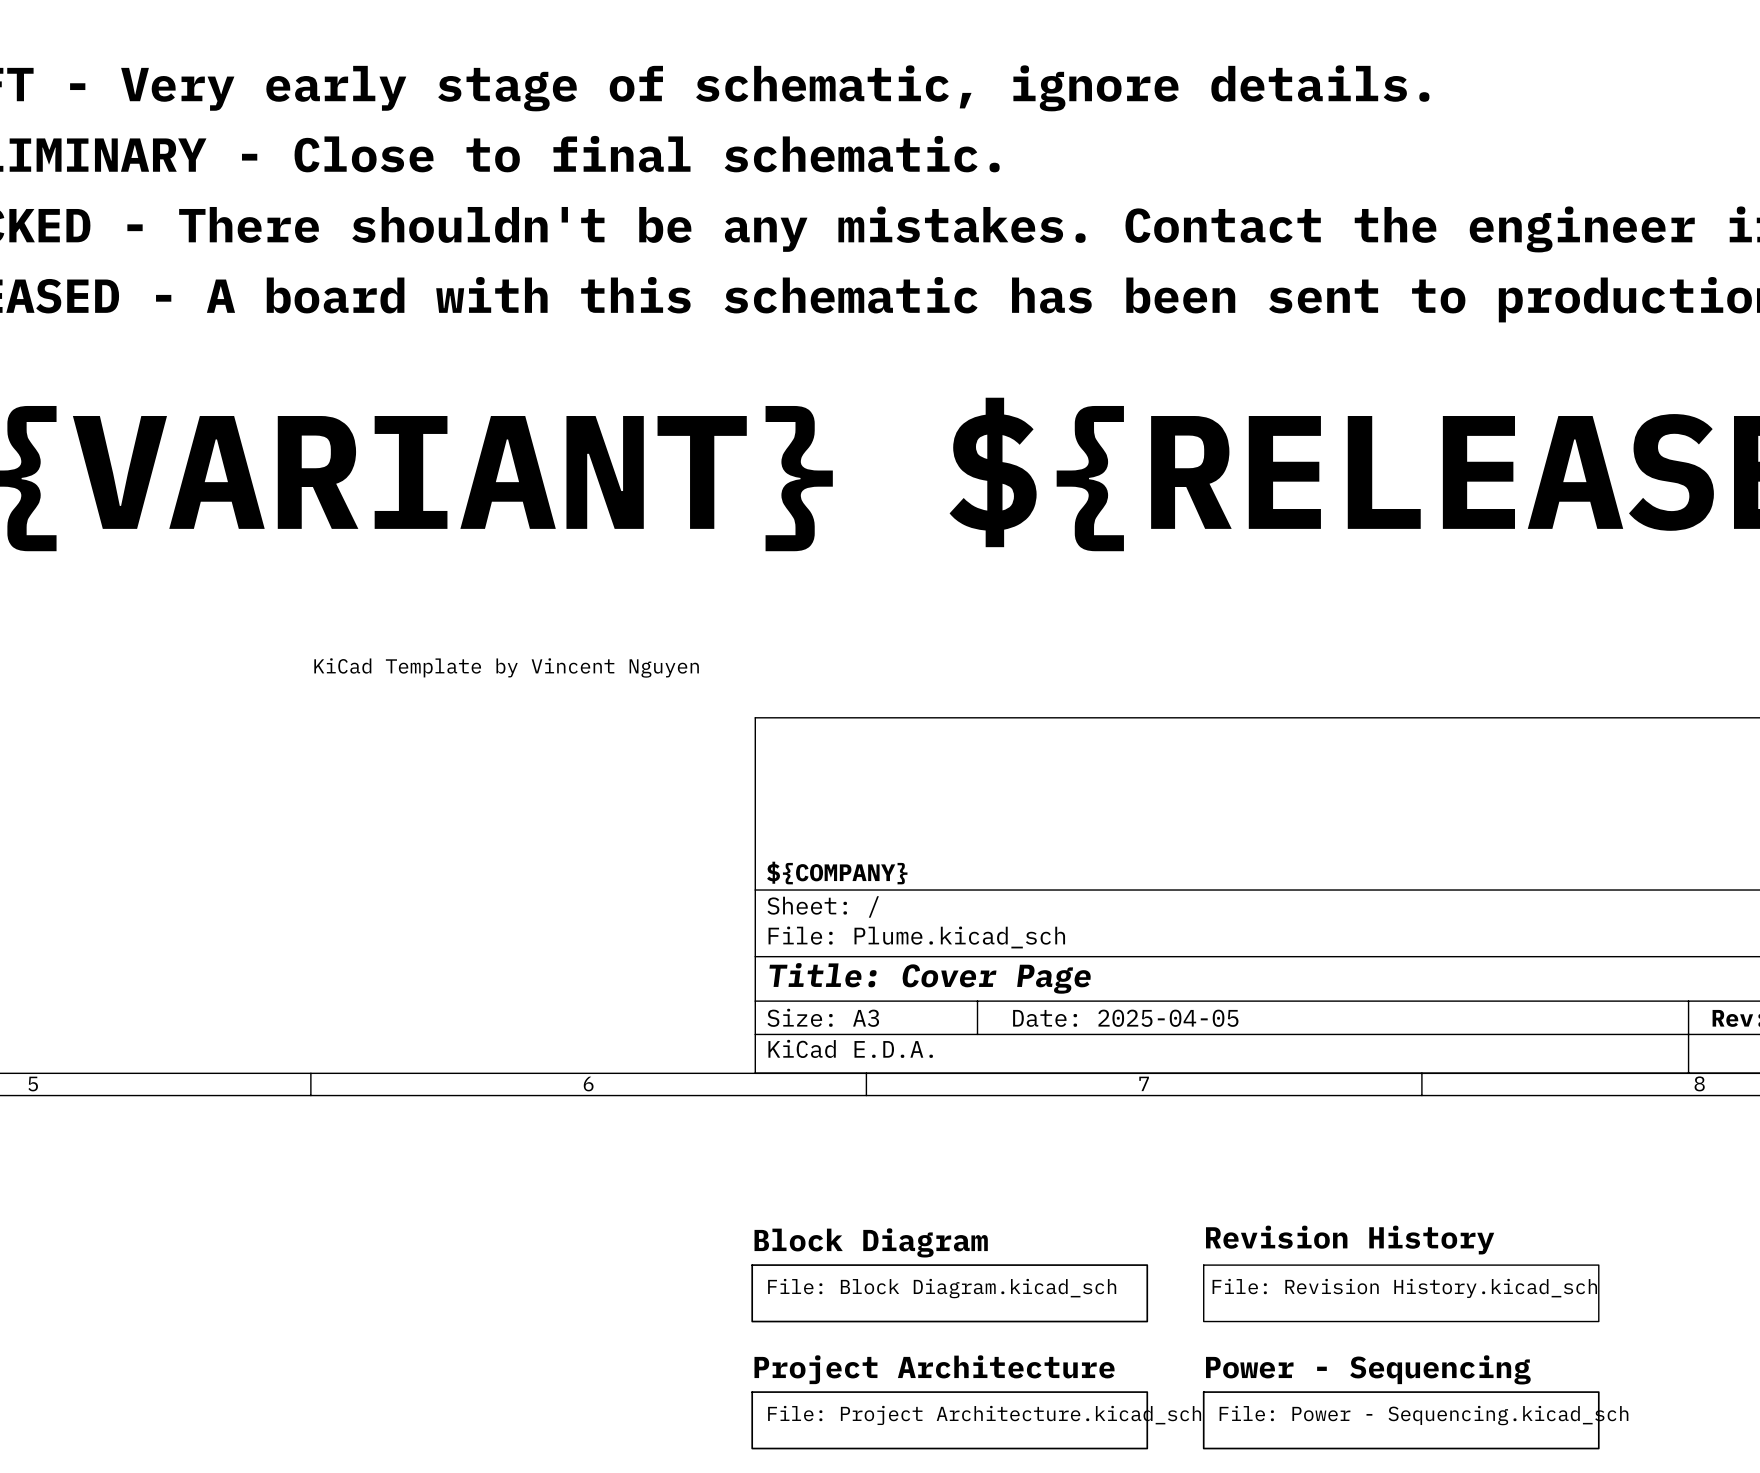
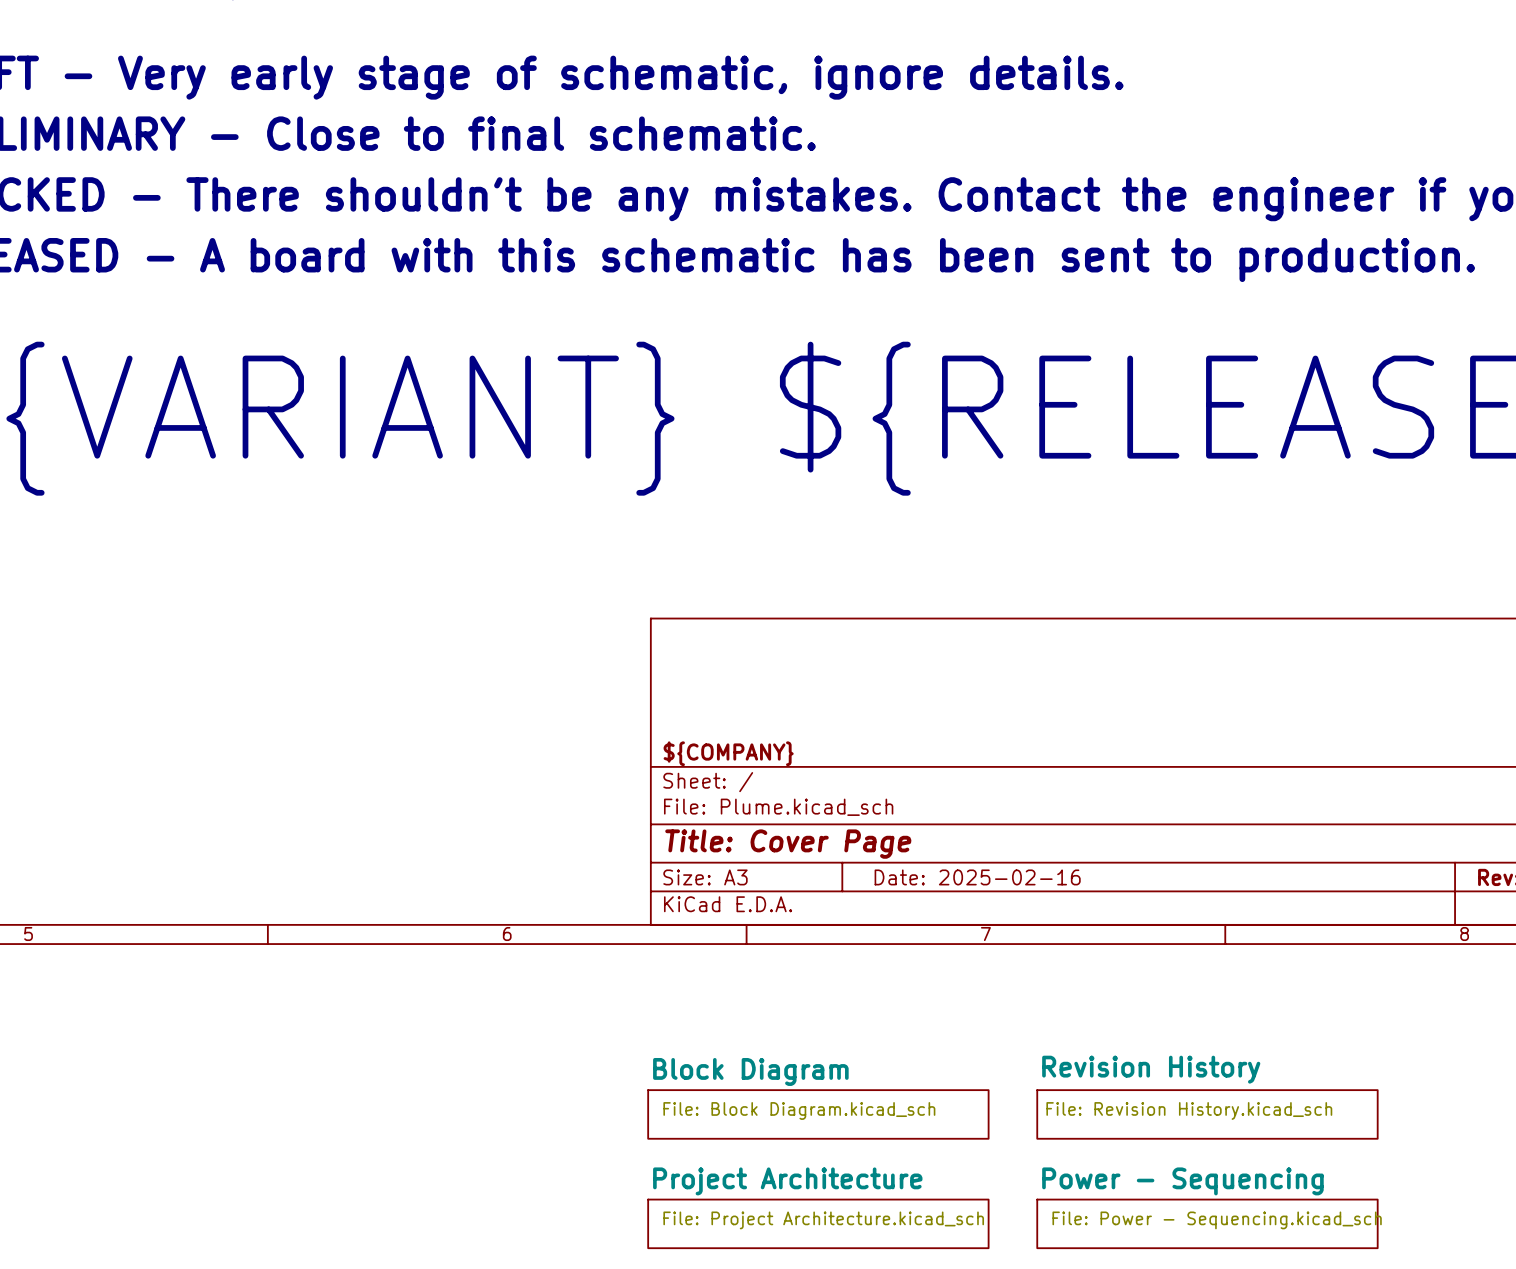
text: KiCad Template by Vincent Nguyen (506, 667) -> none
title block: Date: 2025-04-05 (1125, 1018) -> Date: 2025-02-16 (977, 877)

